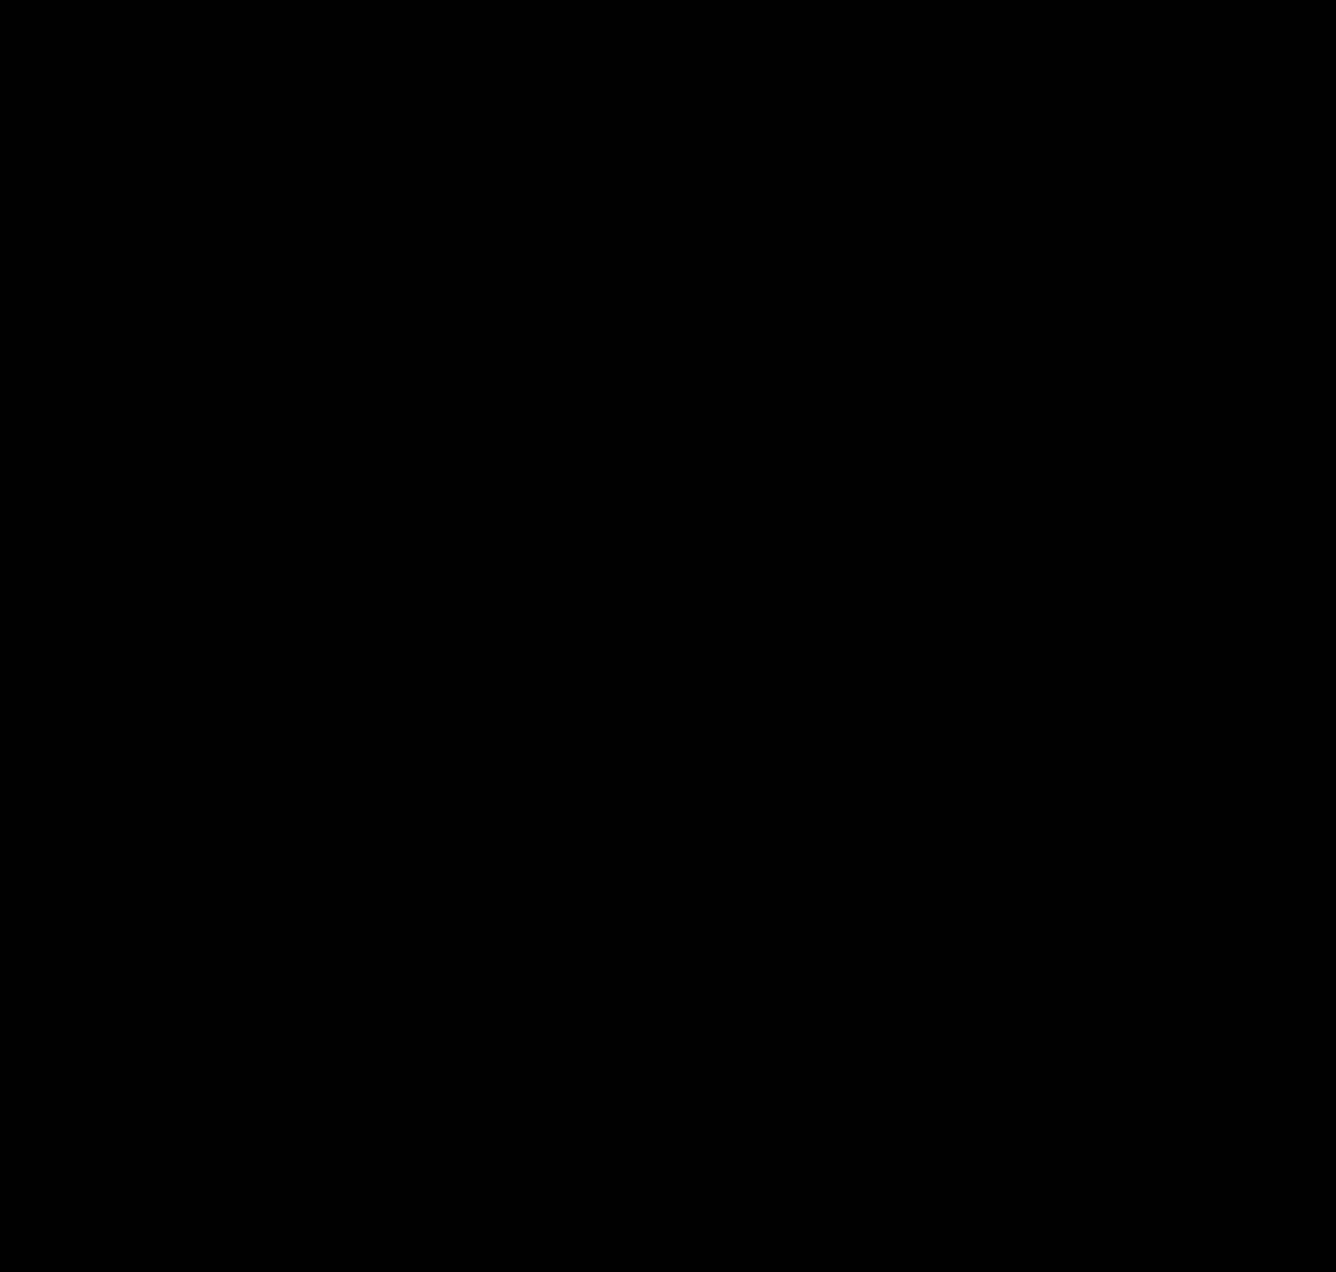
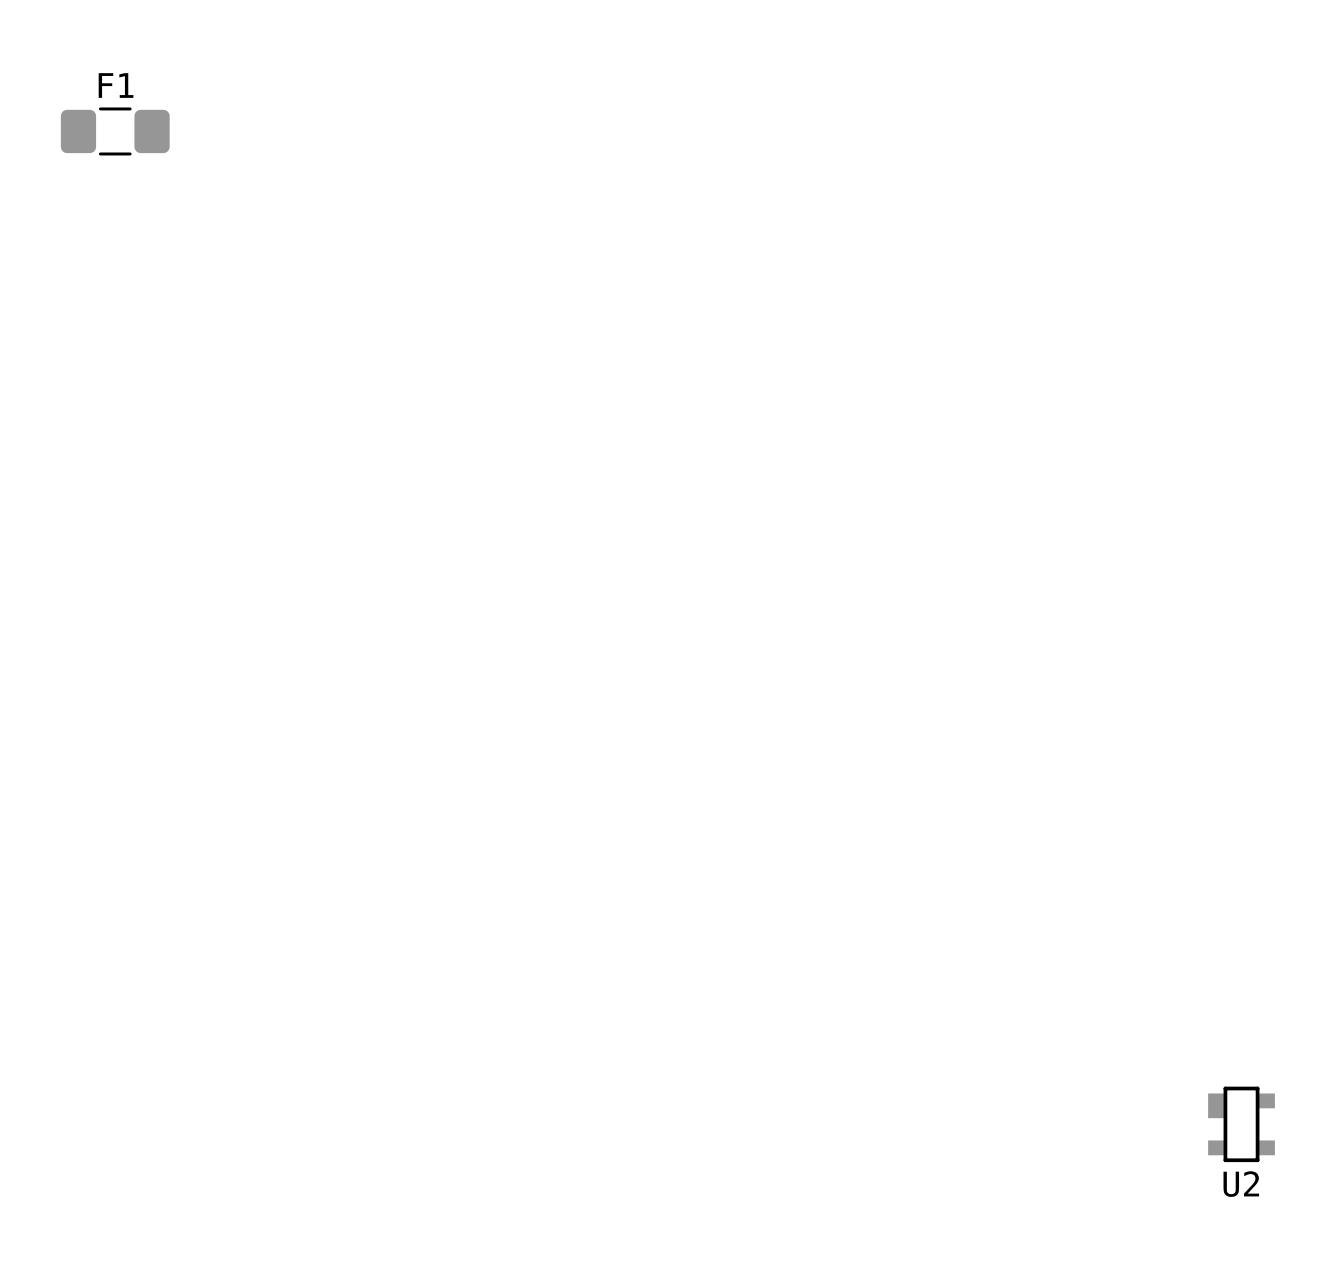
F1: none -> (115, 131)
U2: none -> (1241, 1124)

